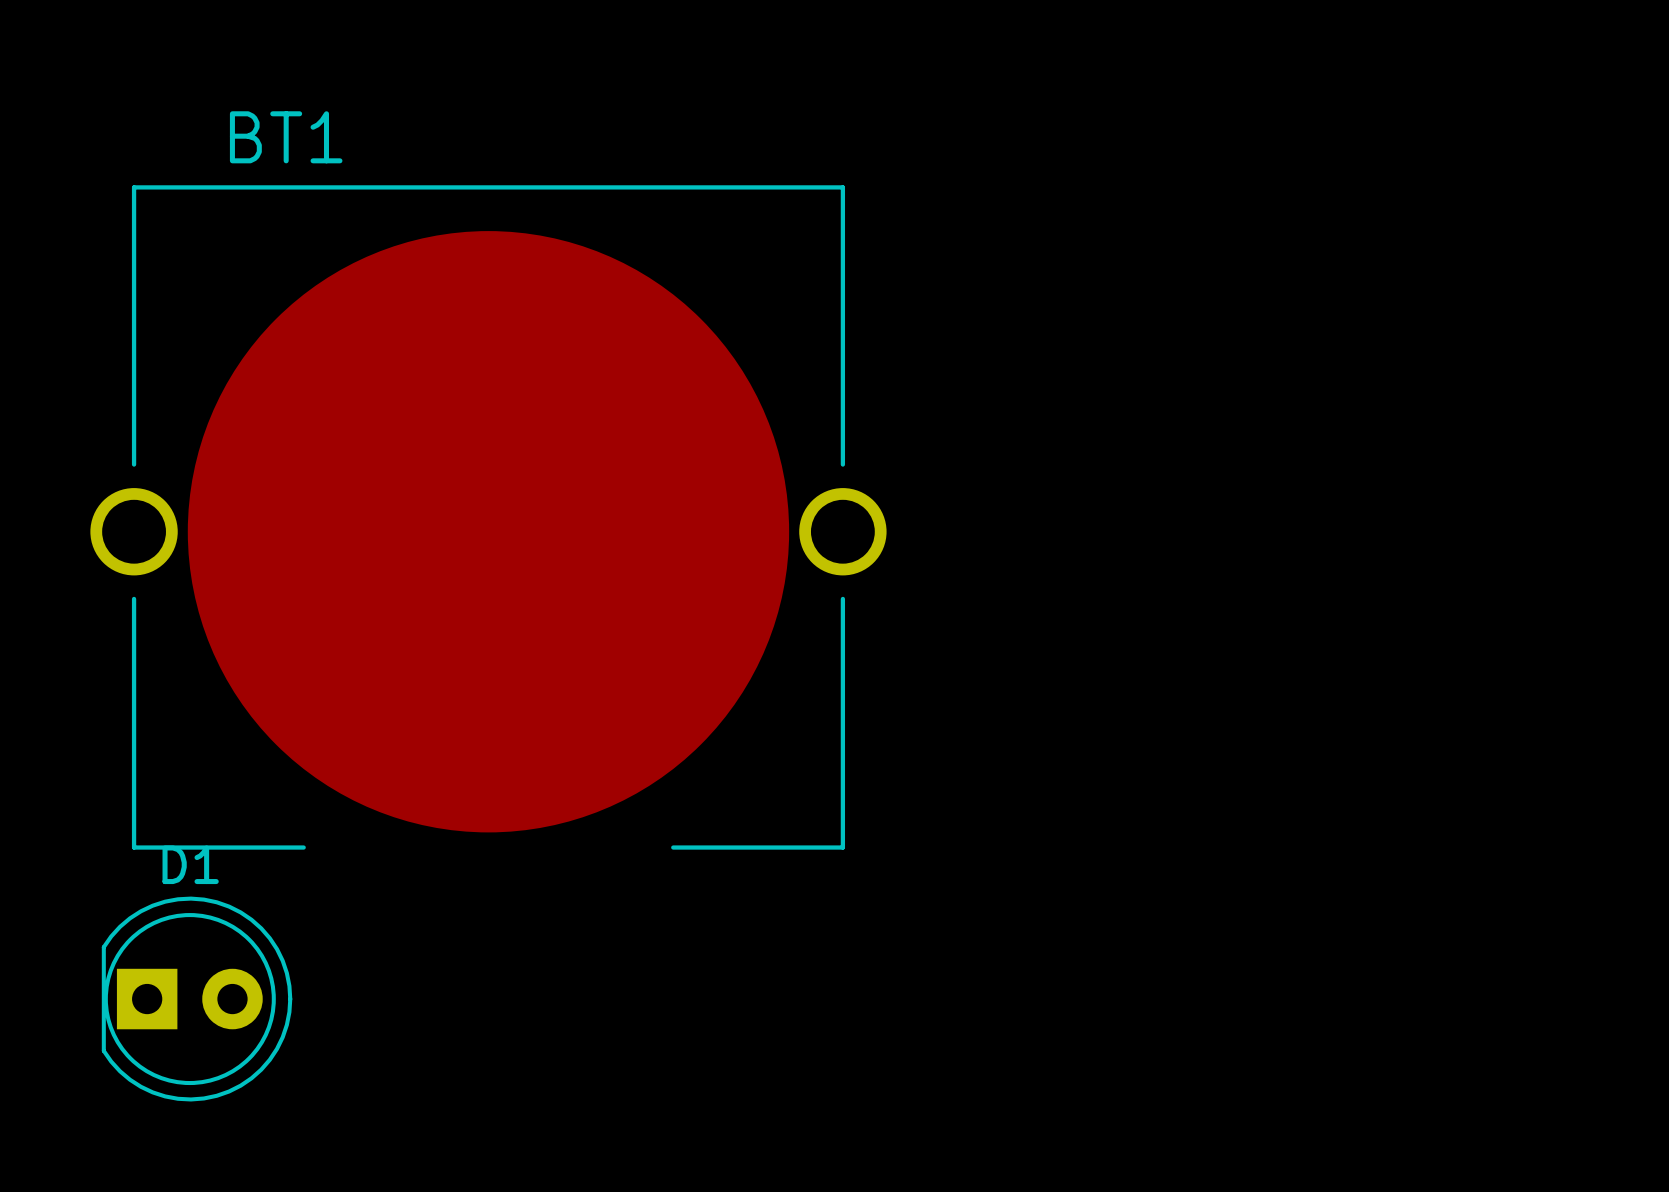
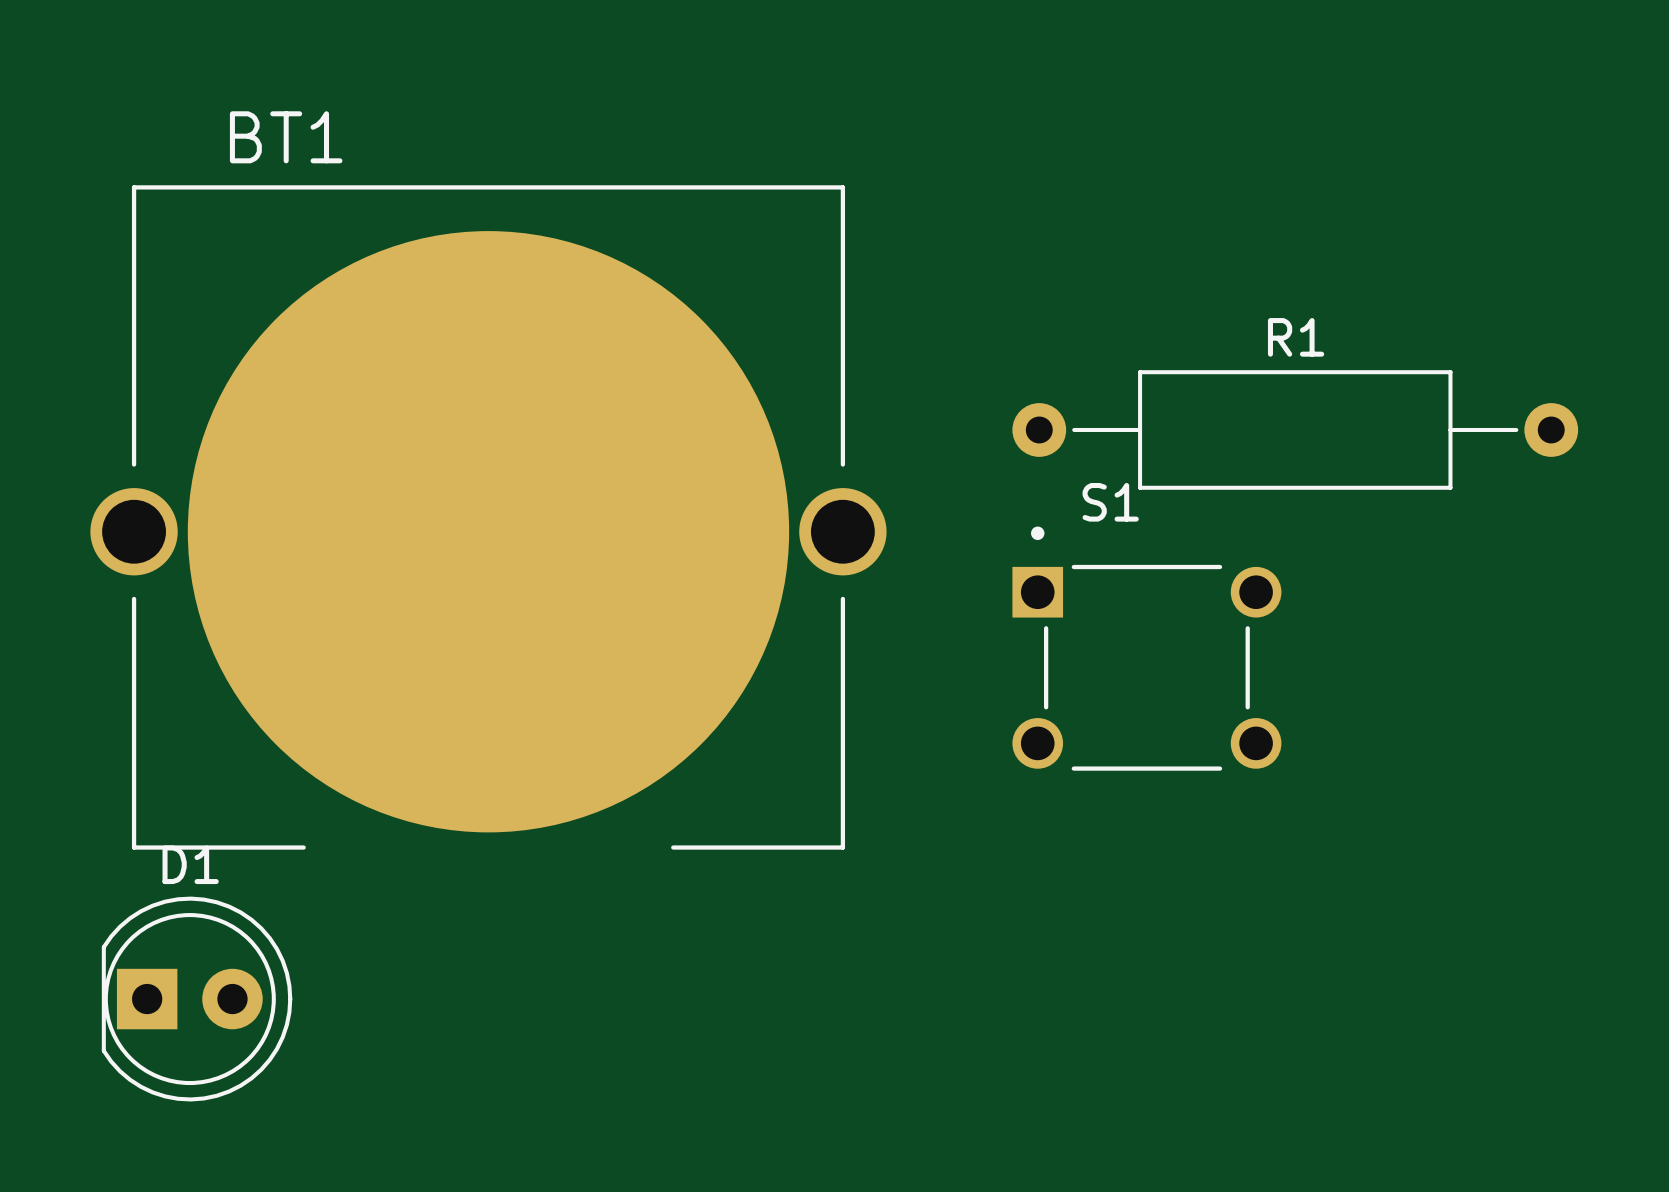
R1: none -> (1295, 429)
S1: none -> (1146, 648)

